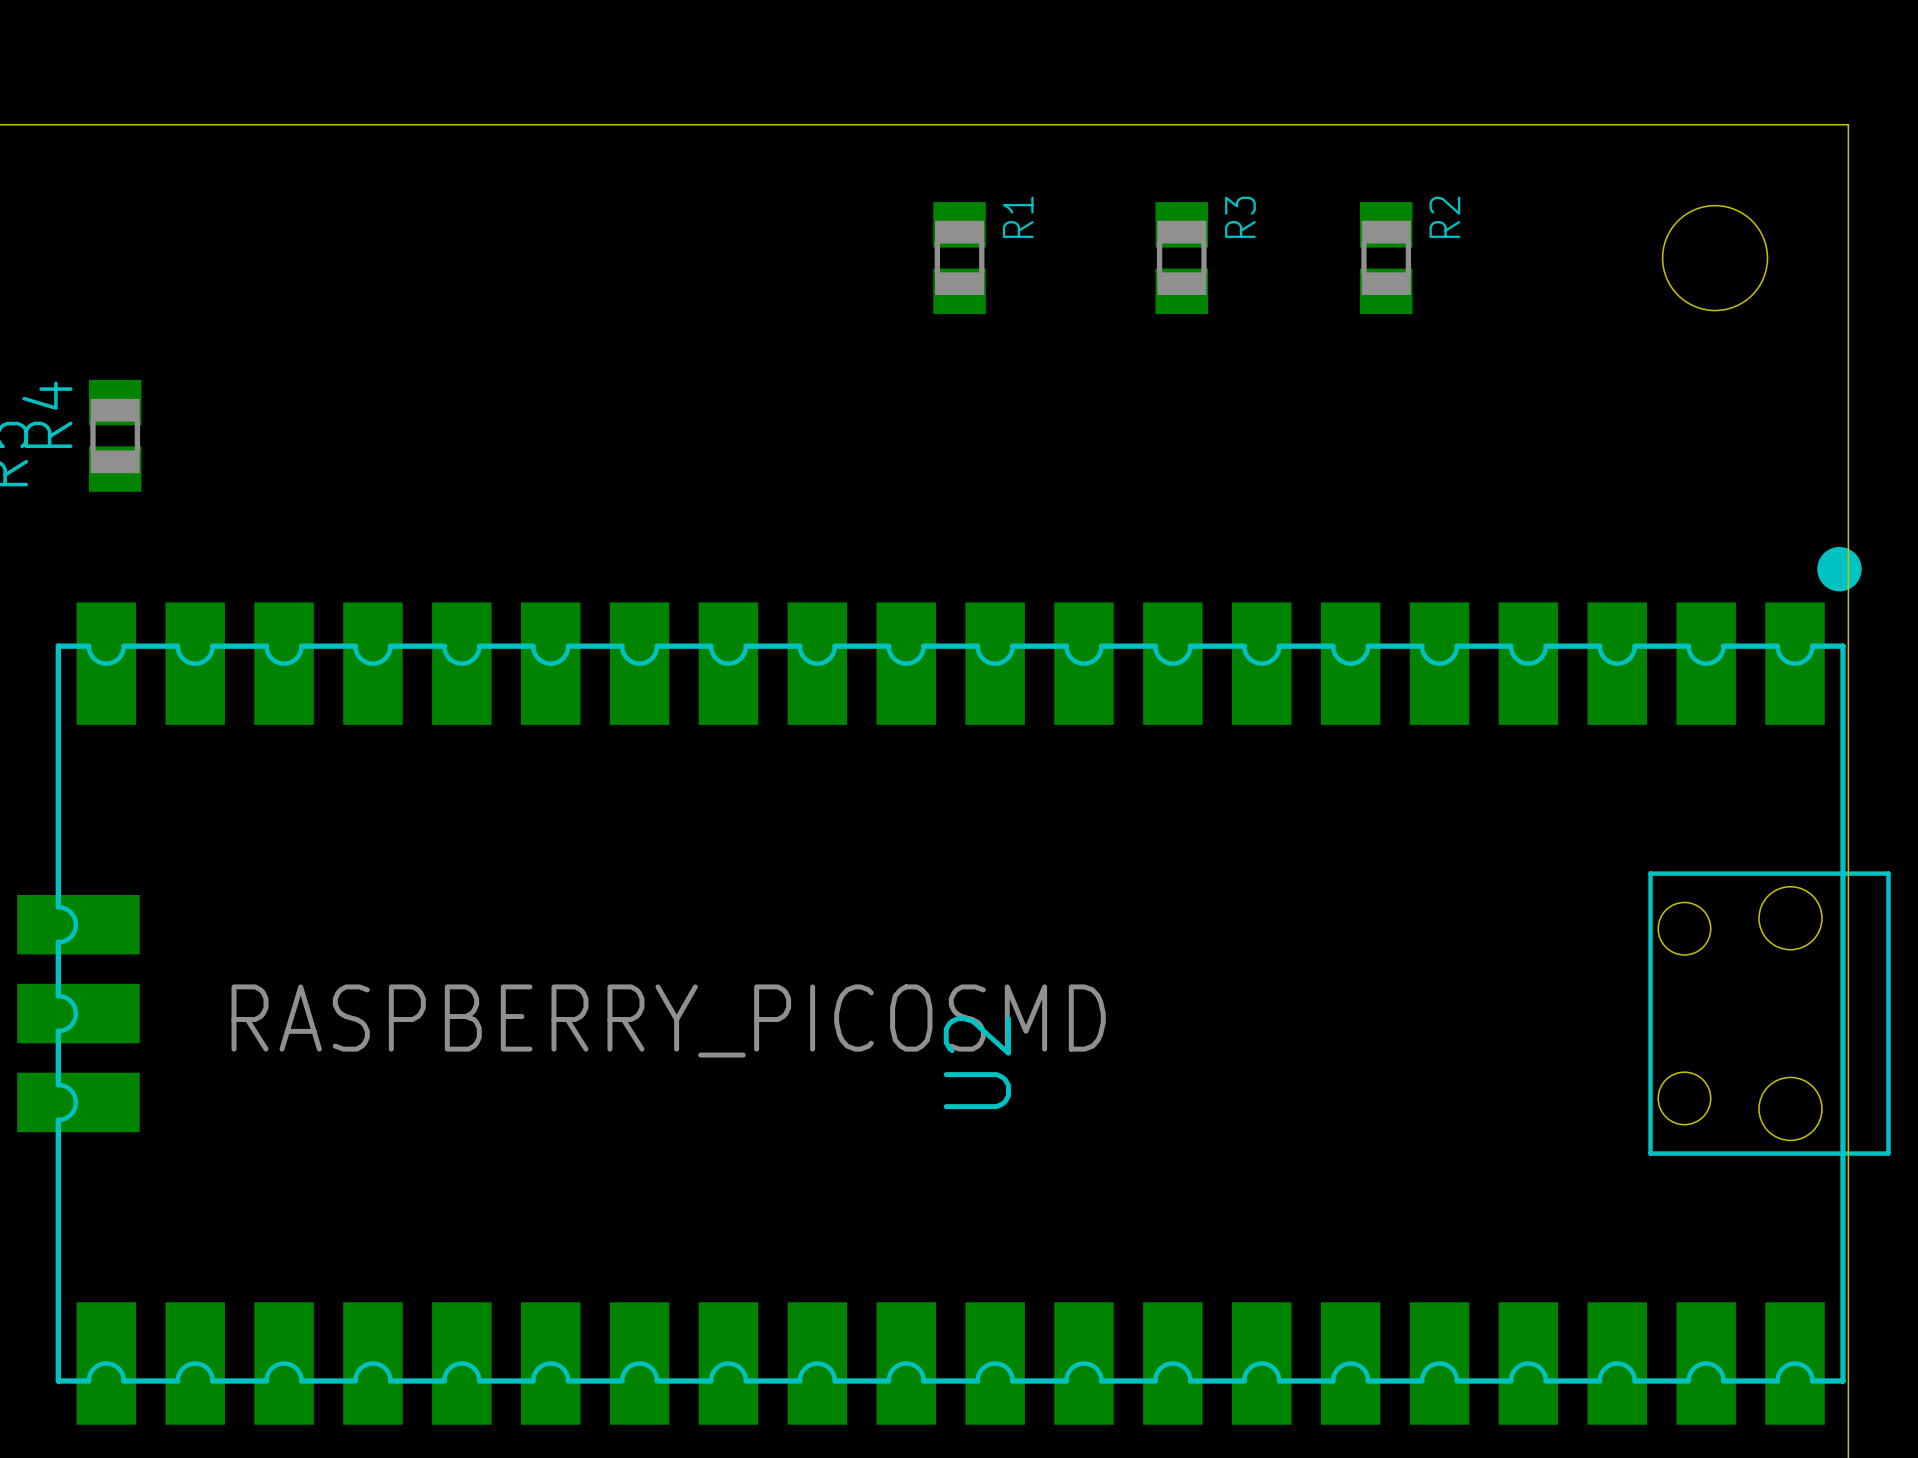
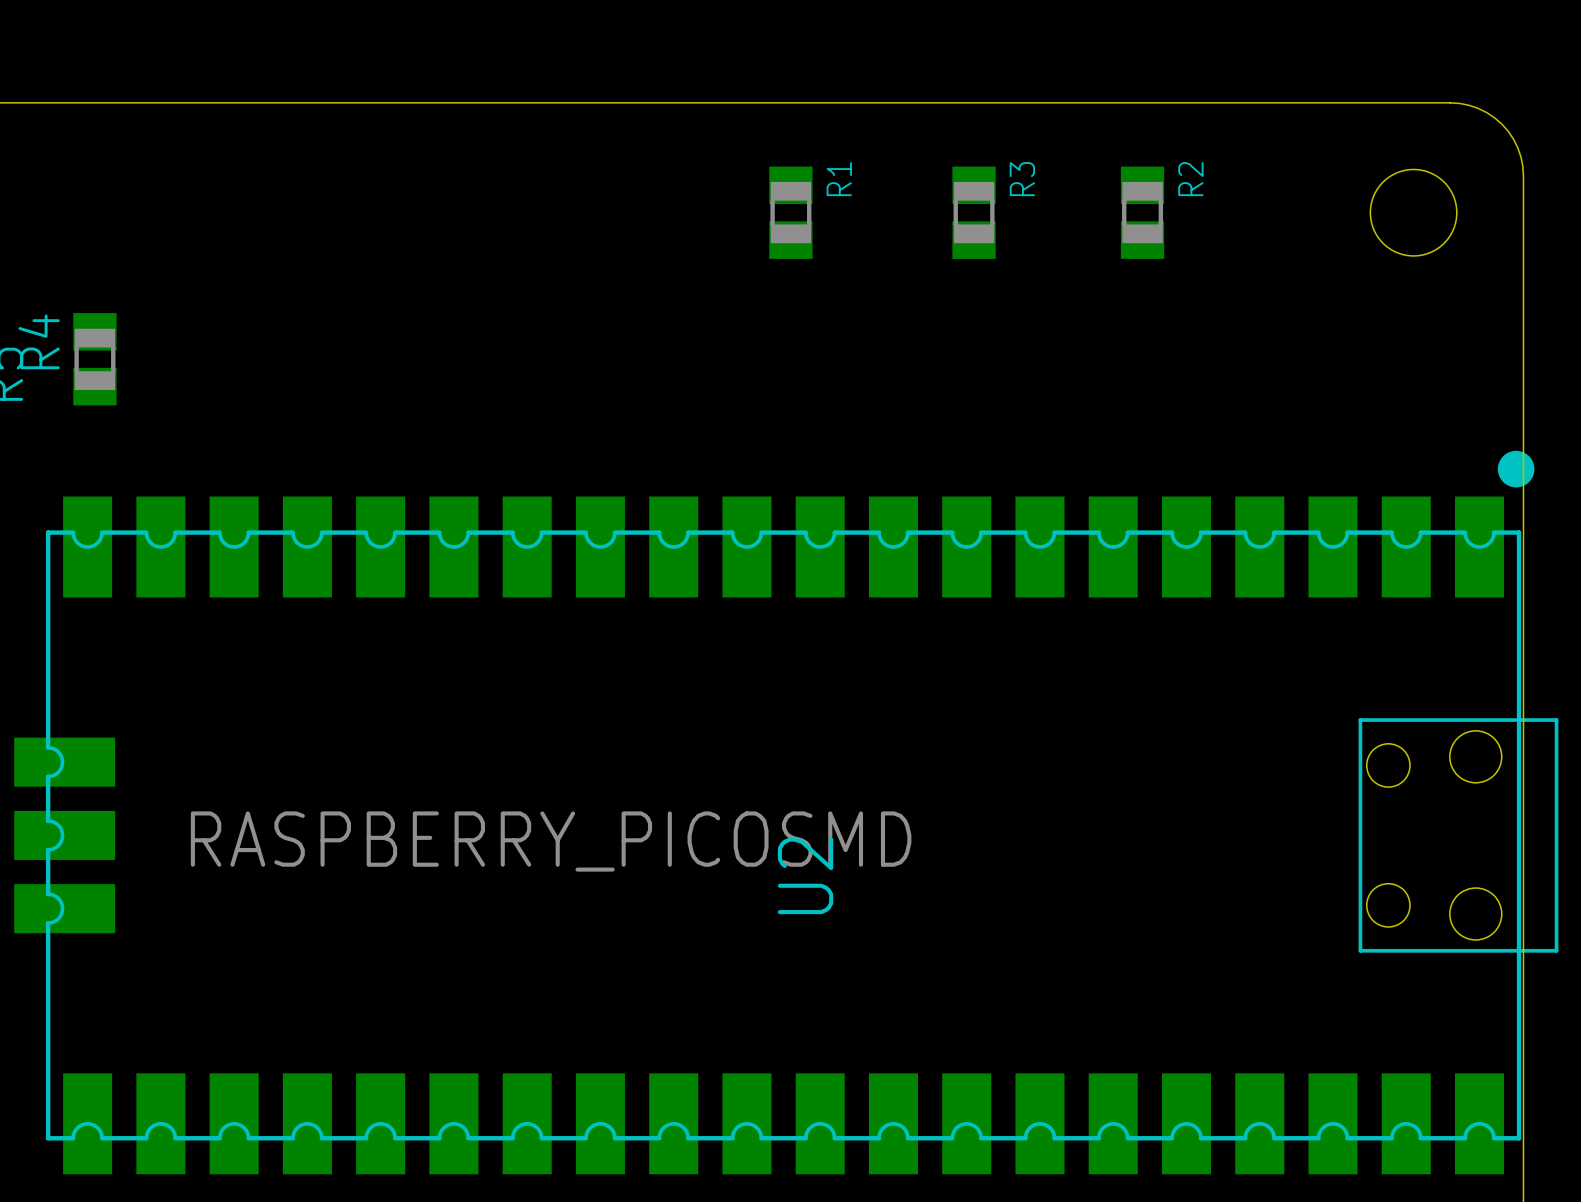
board edge: (1759, 124) (1848, 124) (1848, 213) -> (1450, 102) (1478, 108) (1502, 124) (1517, 148) (1523, 176)

